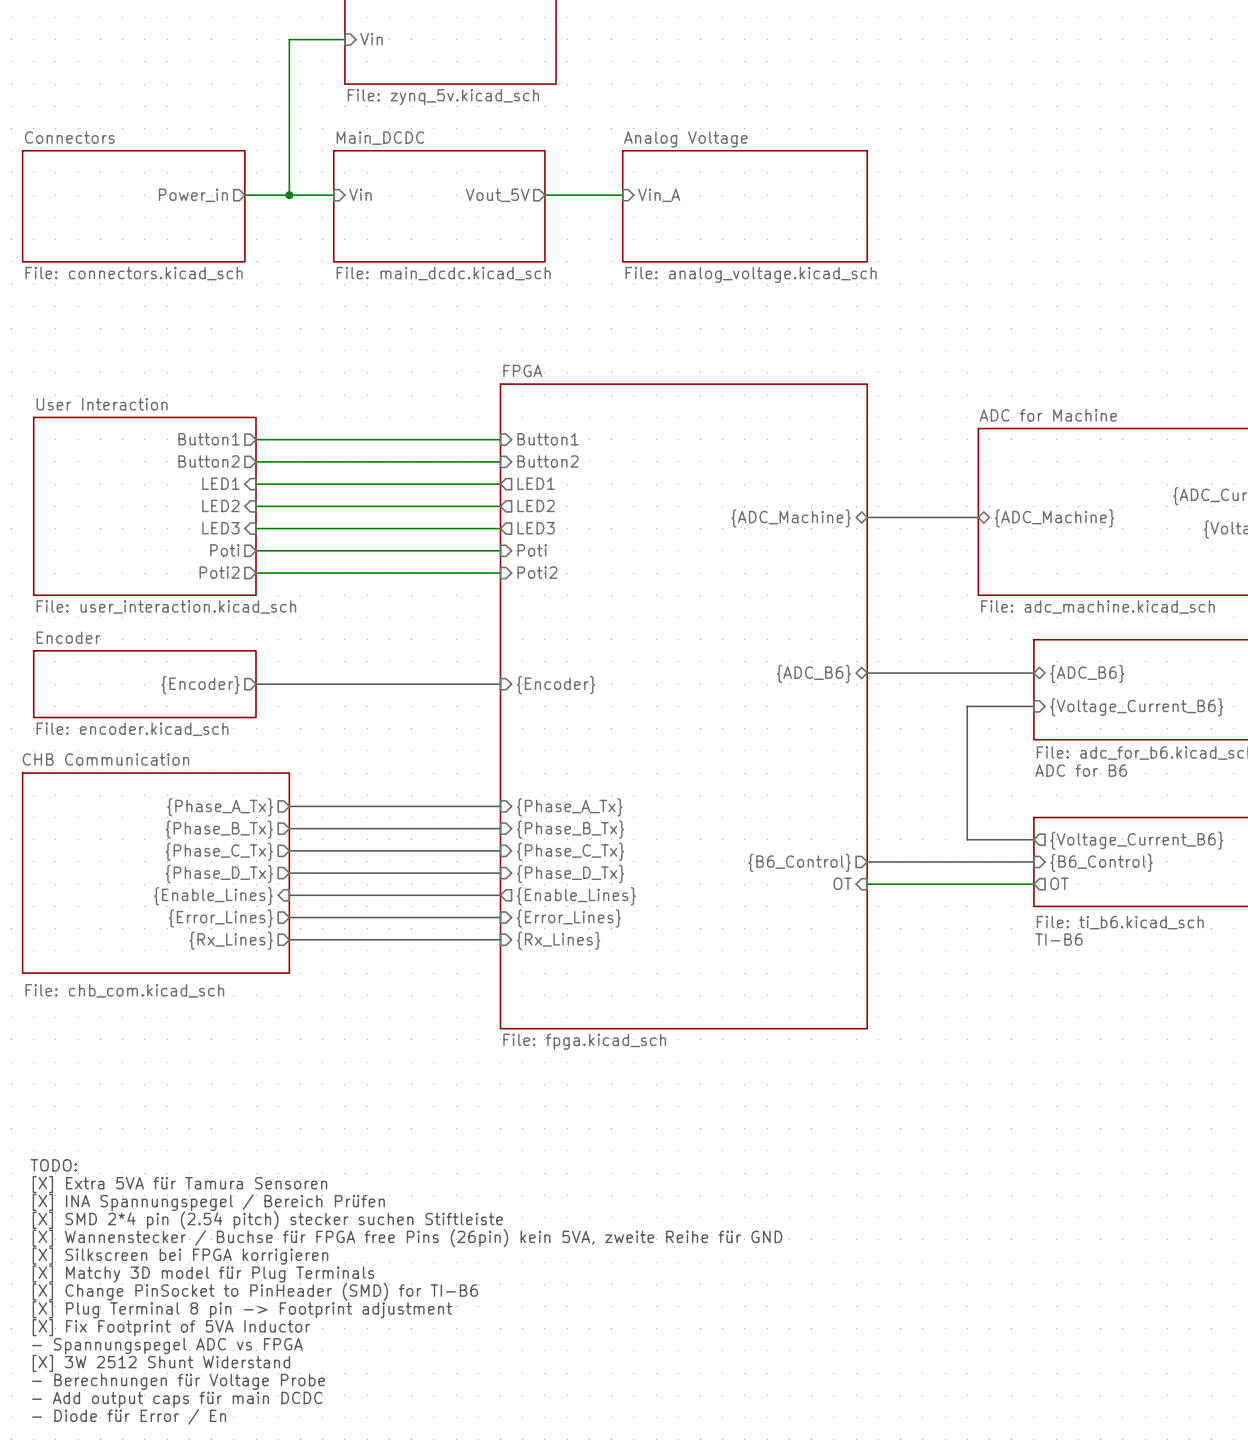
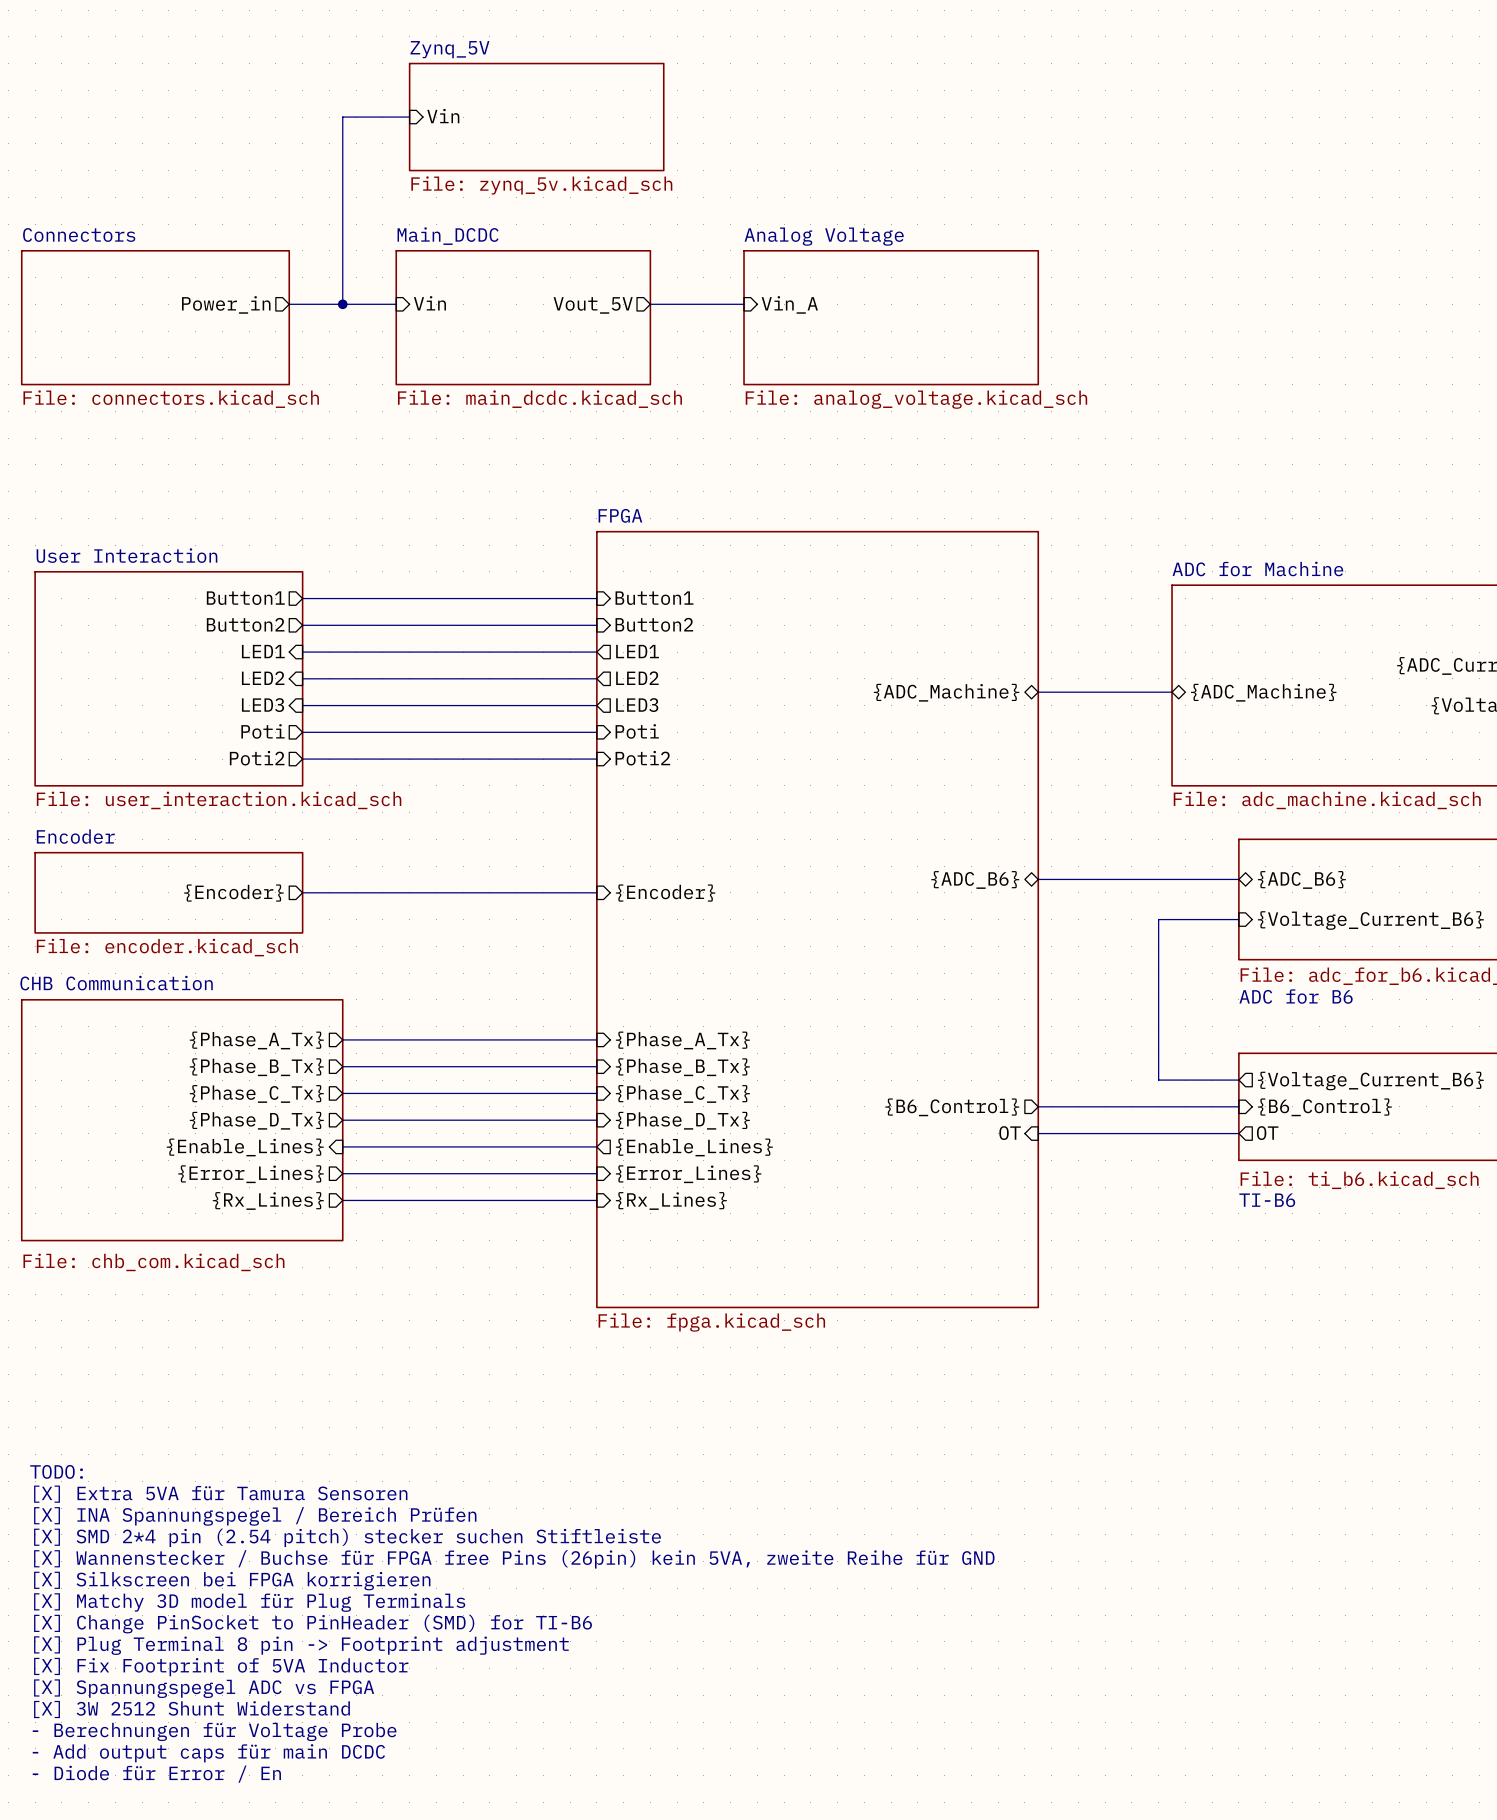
text: - Spannungspegel ADC vs FPGA (167, 1346) -> [X] Spannungspegel ADC vs FPGA (204, 1688)

